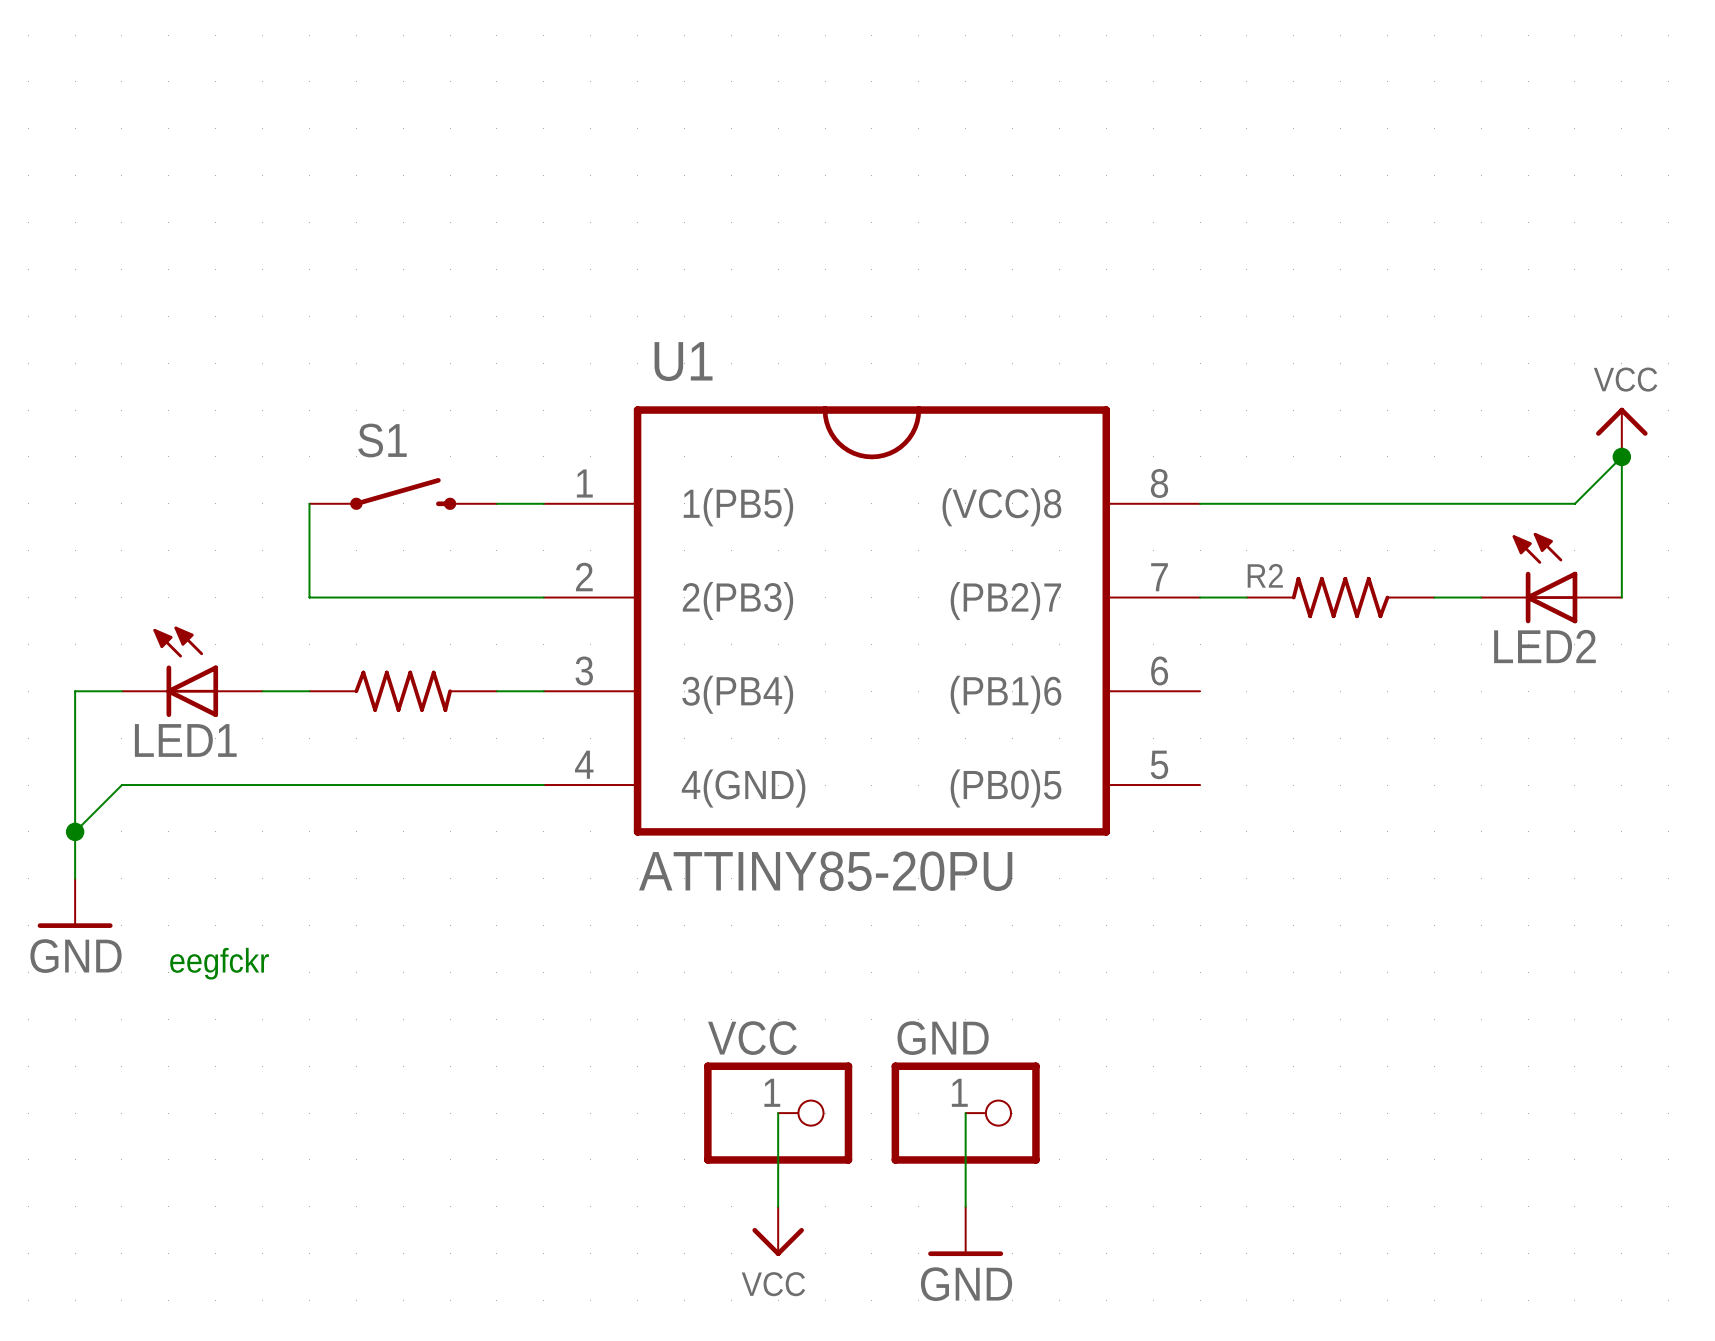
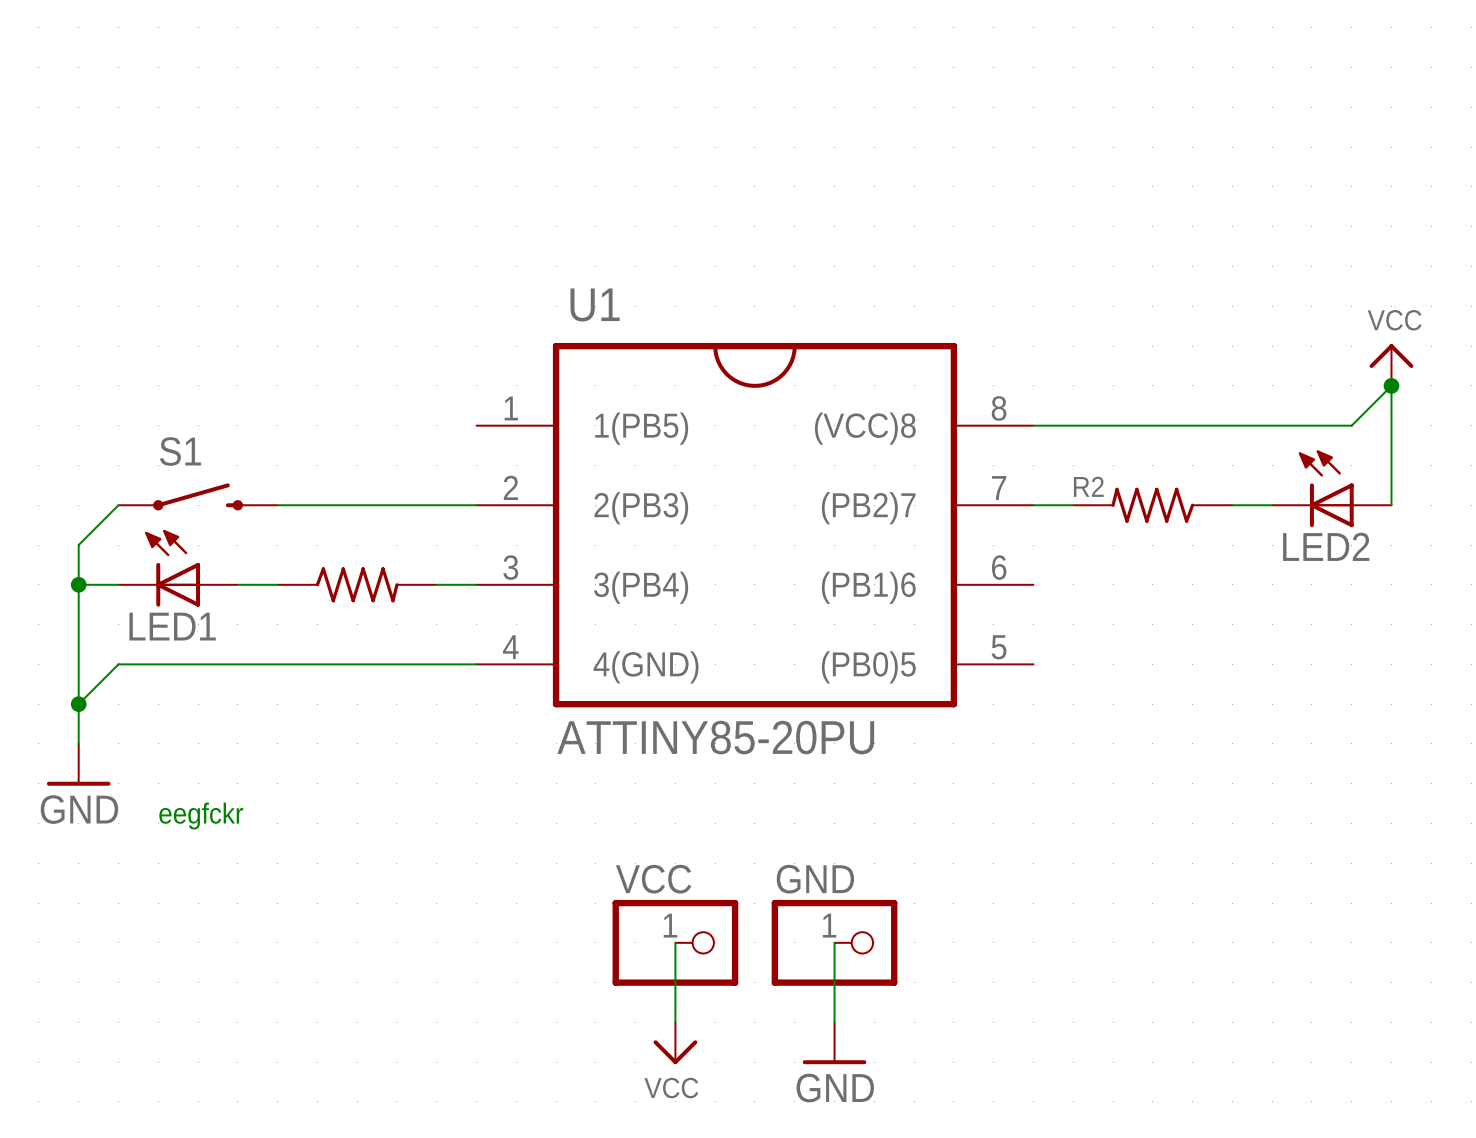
S1 position: (403, 493) -> (198, 496)
wire: (309, 503) (309, 597) -> none
wire: (496, 503) (543, 503) -> none
wire: none -> (118, 505) (78, 545) (78, 584)
junction: none -> (78, 584)

